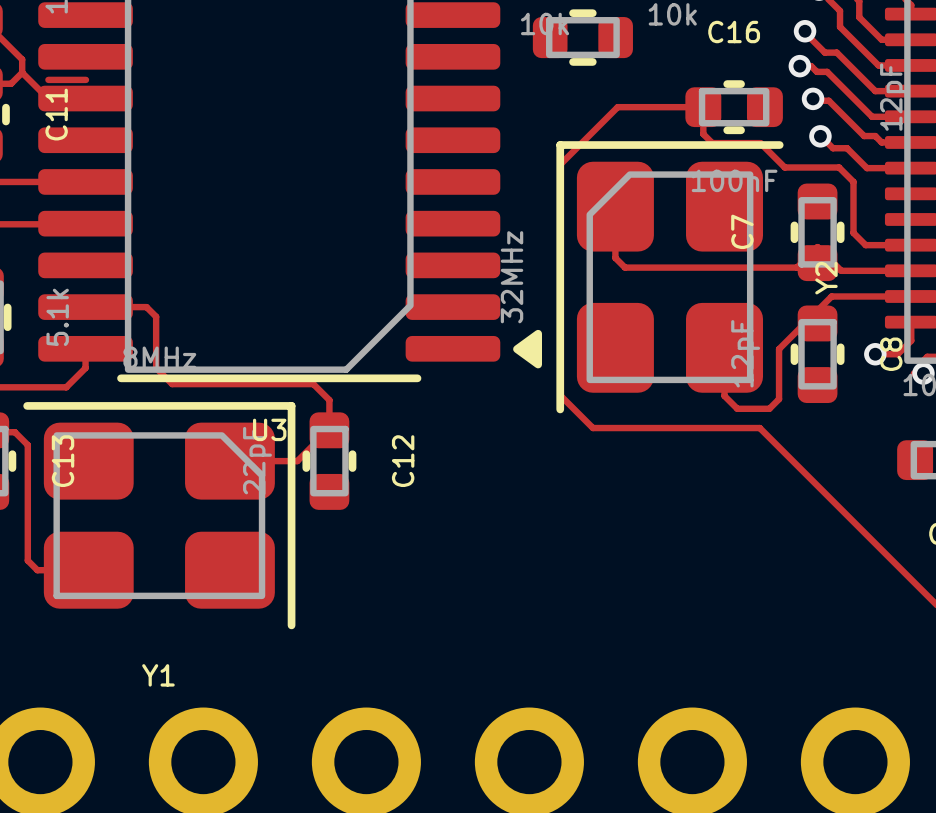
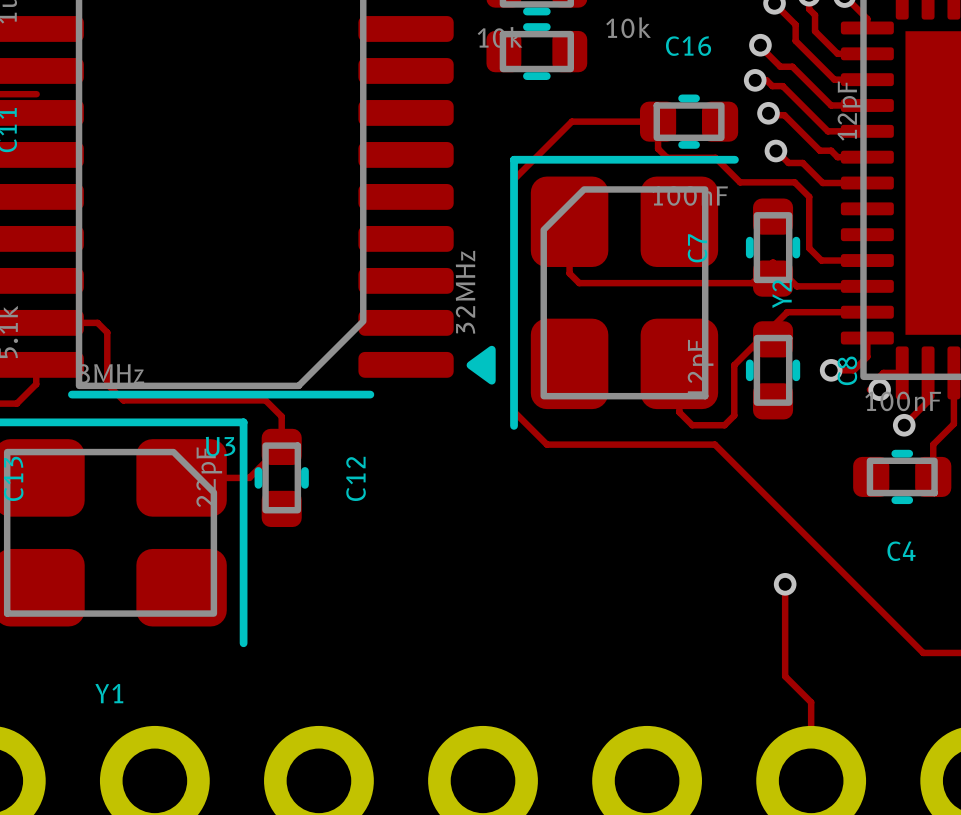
track: none -> (785, 584) (785, 676) (811, 702) (811, 780)
via: none -> (785, 584)

